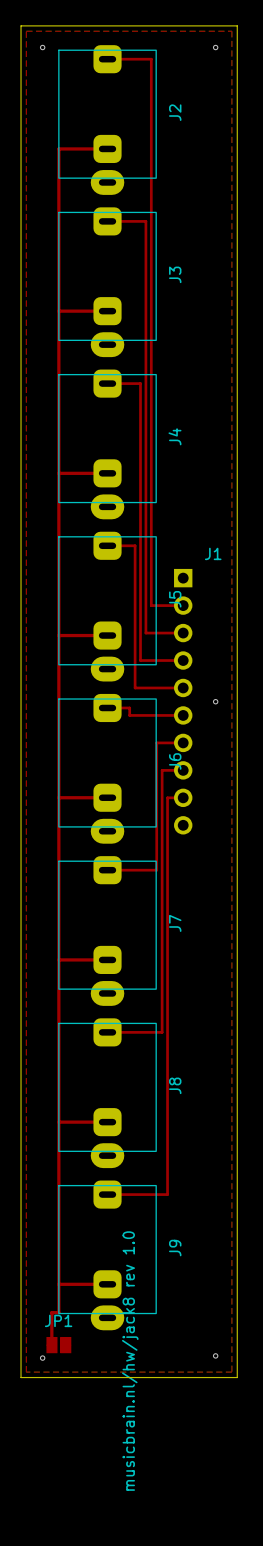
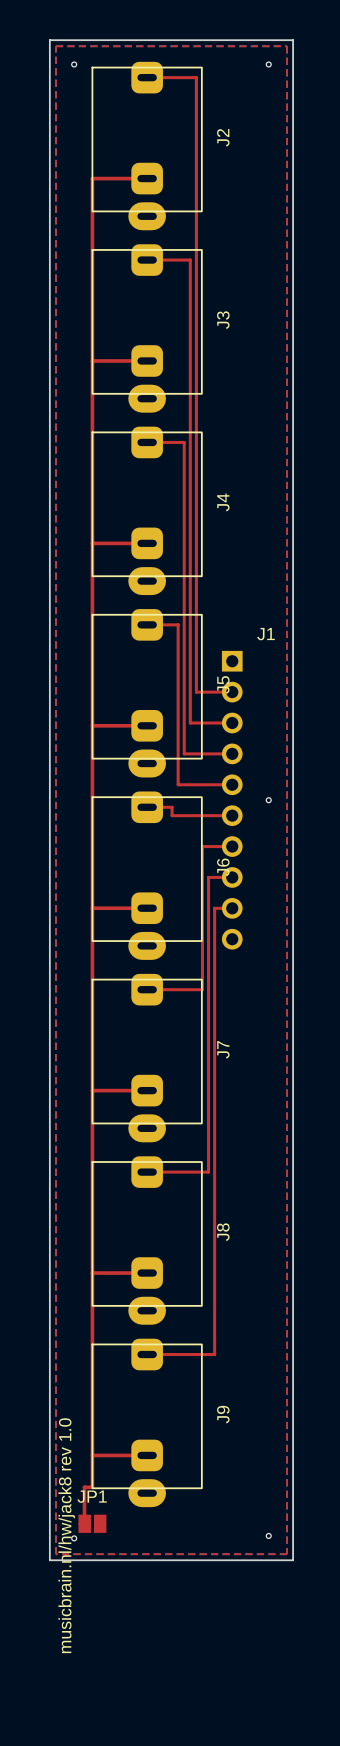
text position: musicbrain.nl/hw/jack8 rev 1.0 (130, 1361) -> musicbrain.nl/hw/jack8 rev 1.0 (66, 1535)

